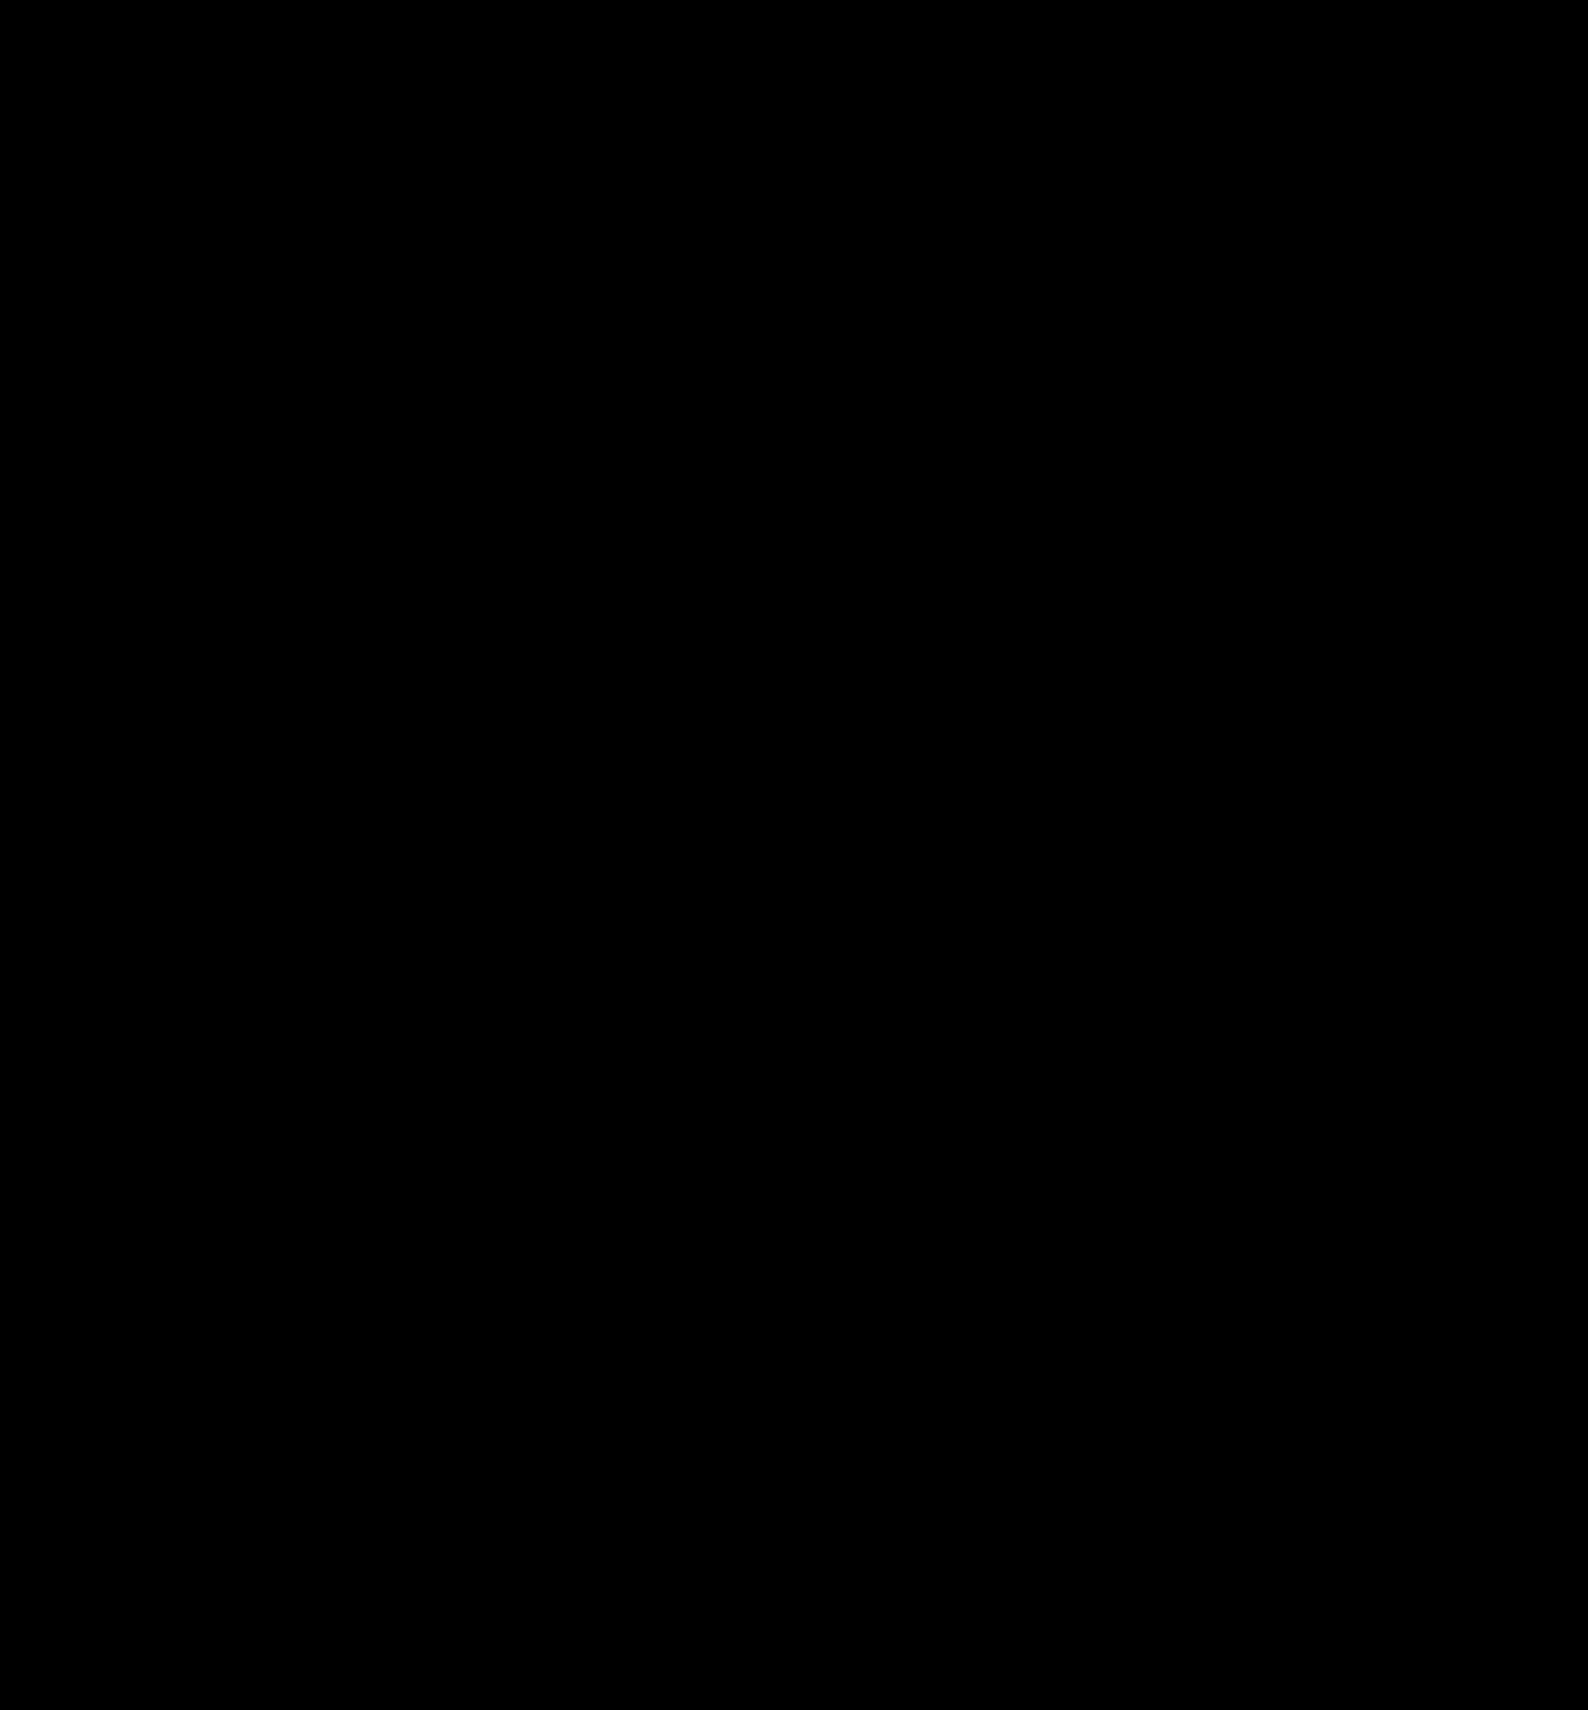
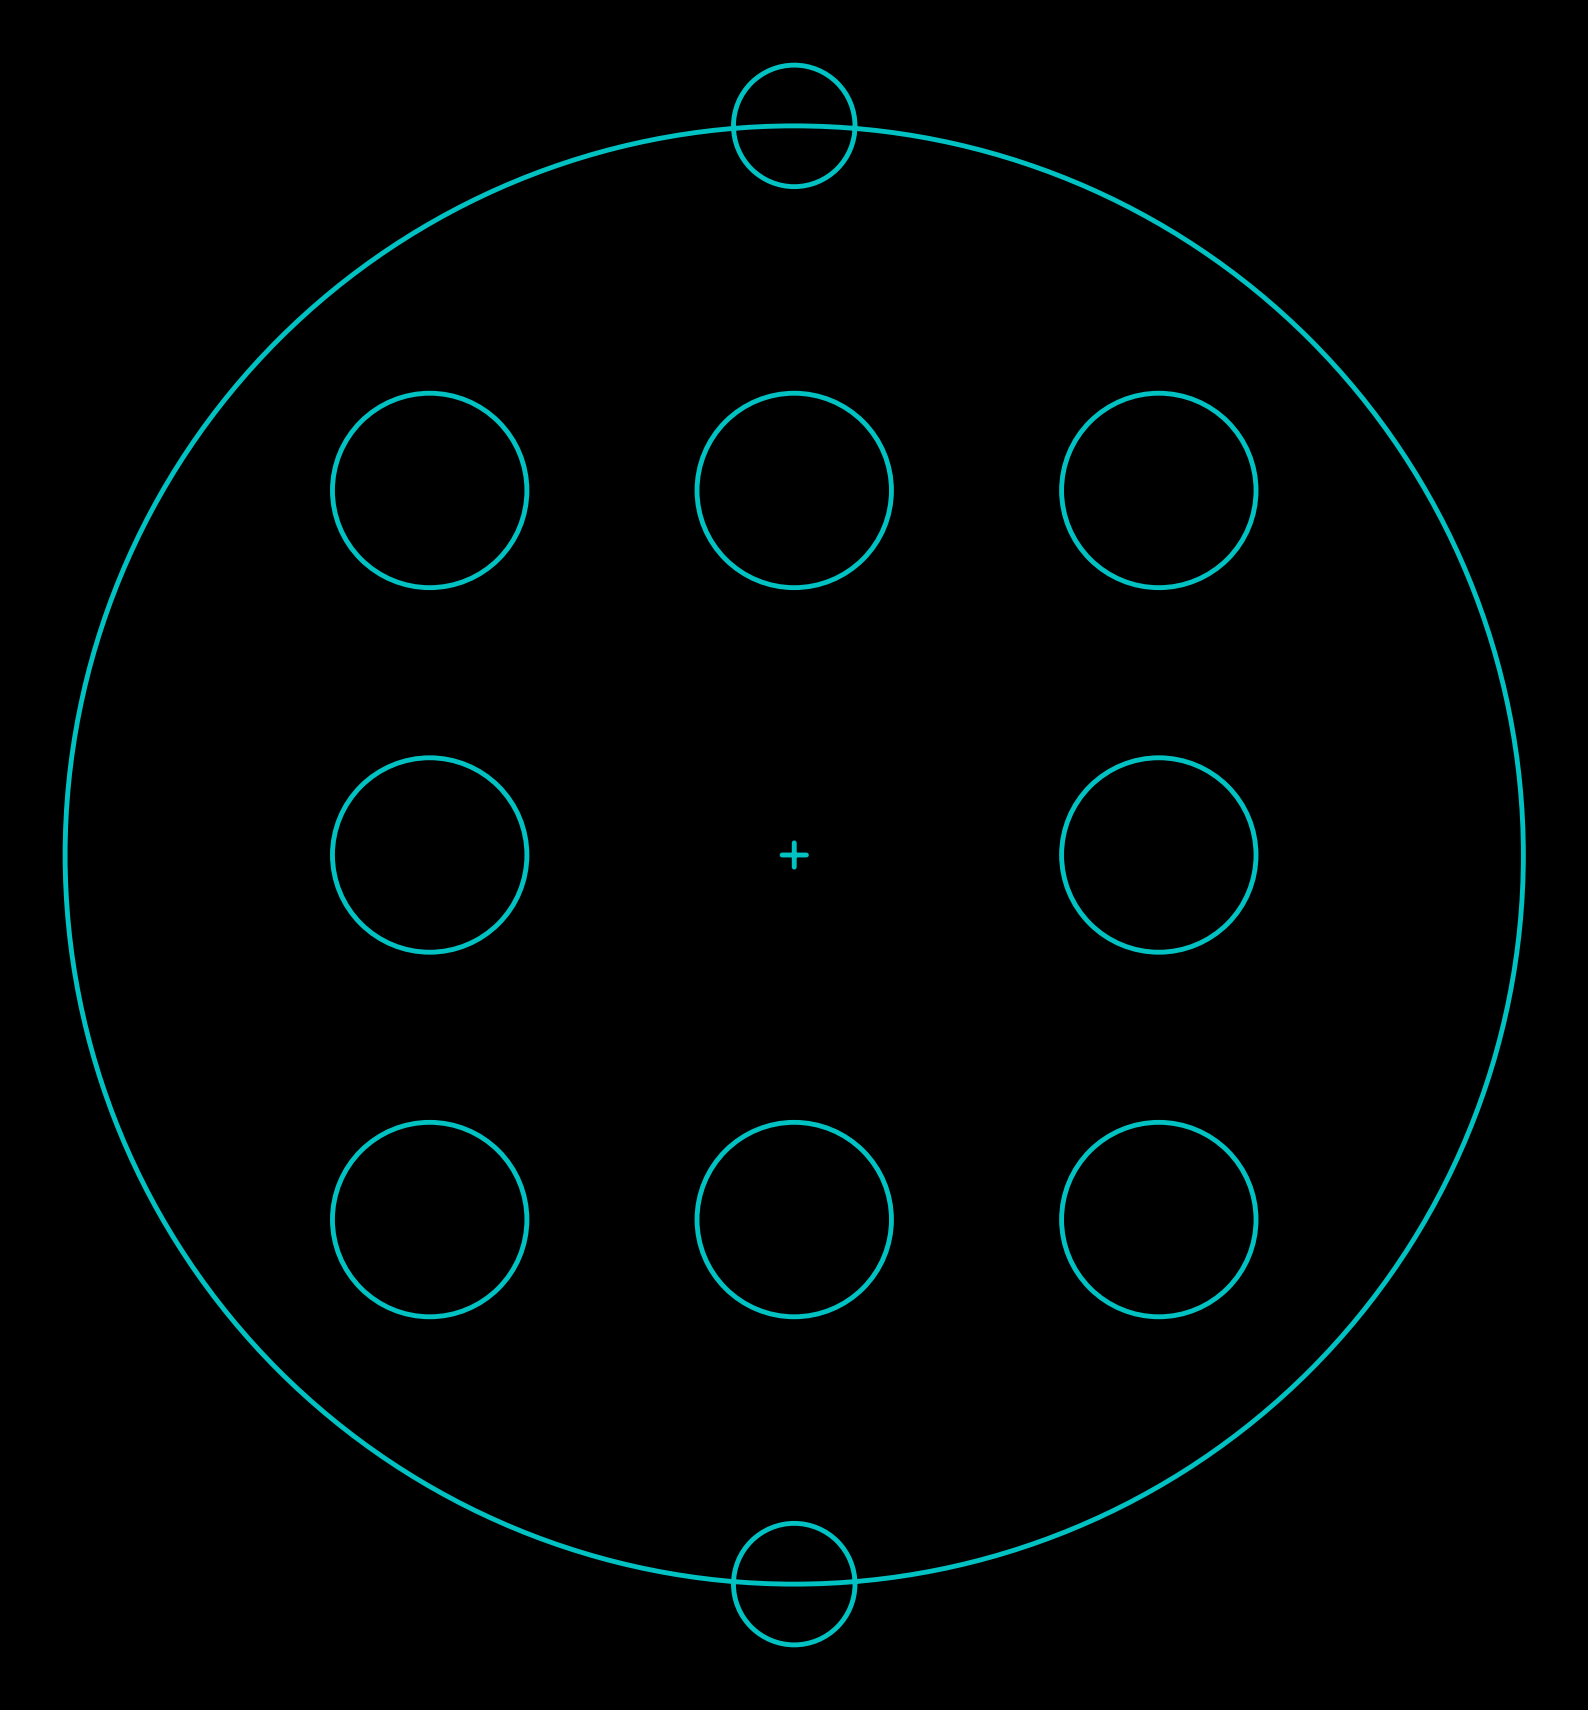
drawing: none -> [62, 62, 1526, 1648]
line: none -> (794, 842) (794, 867)
line: none -> (782, 855) (806, 855)

